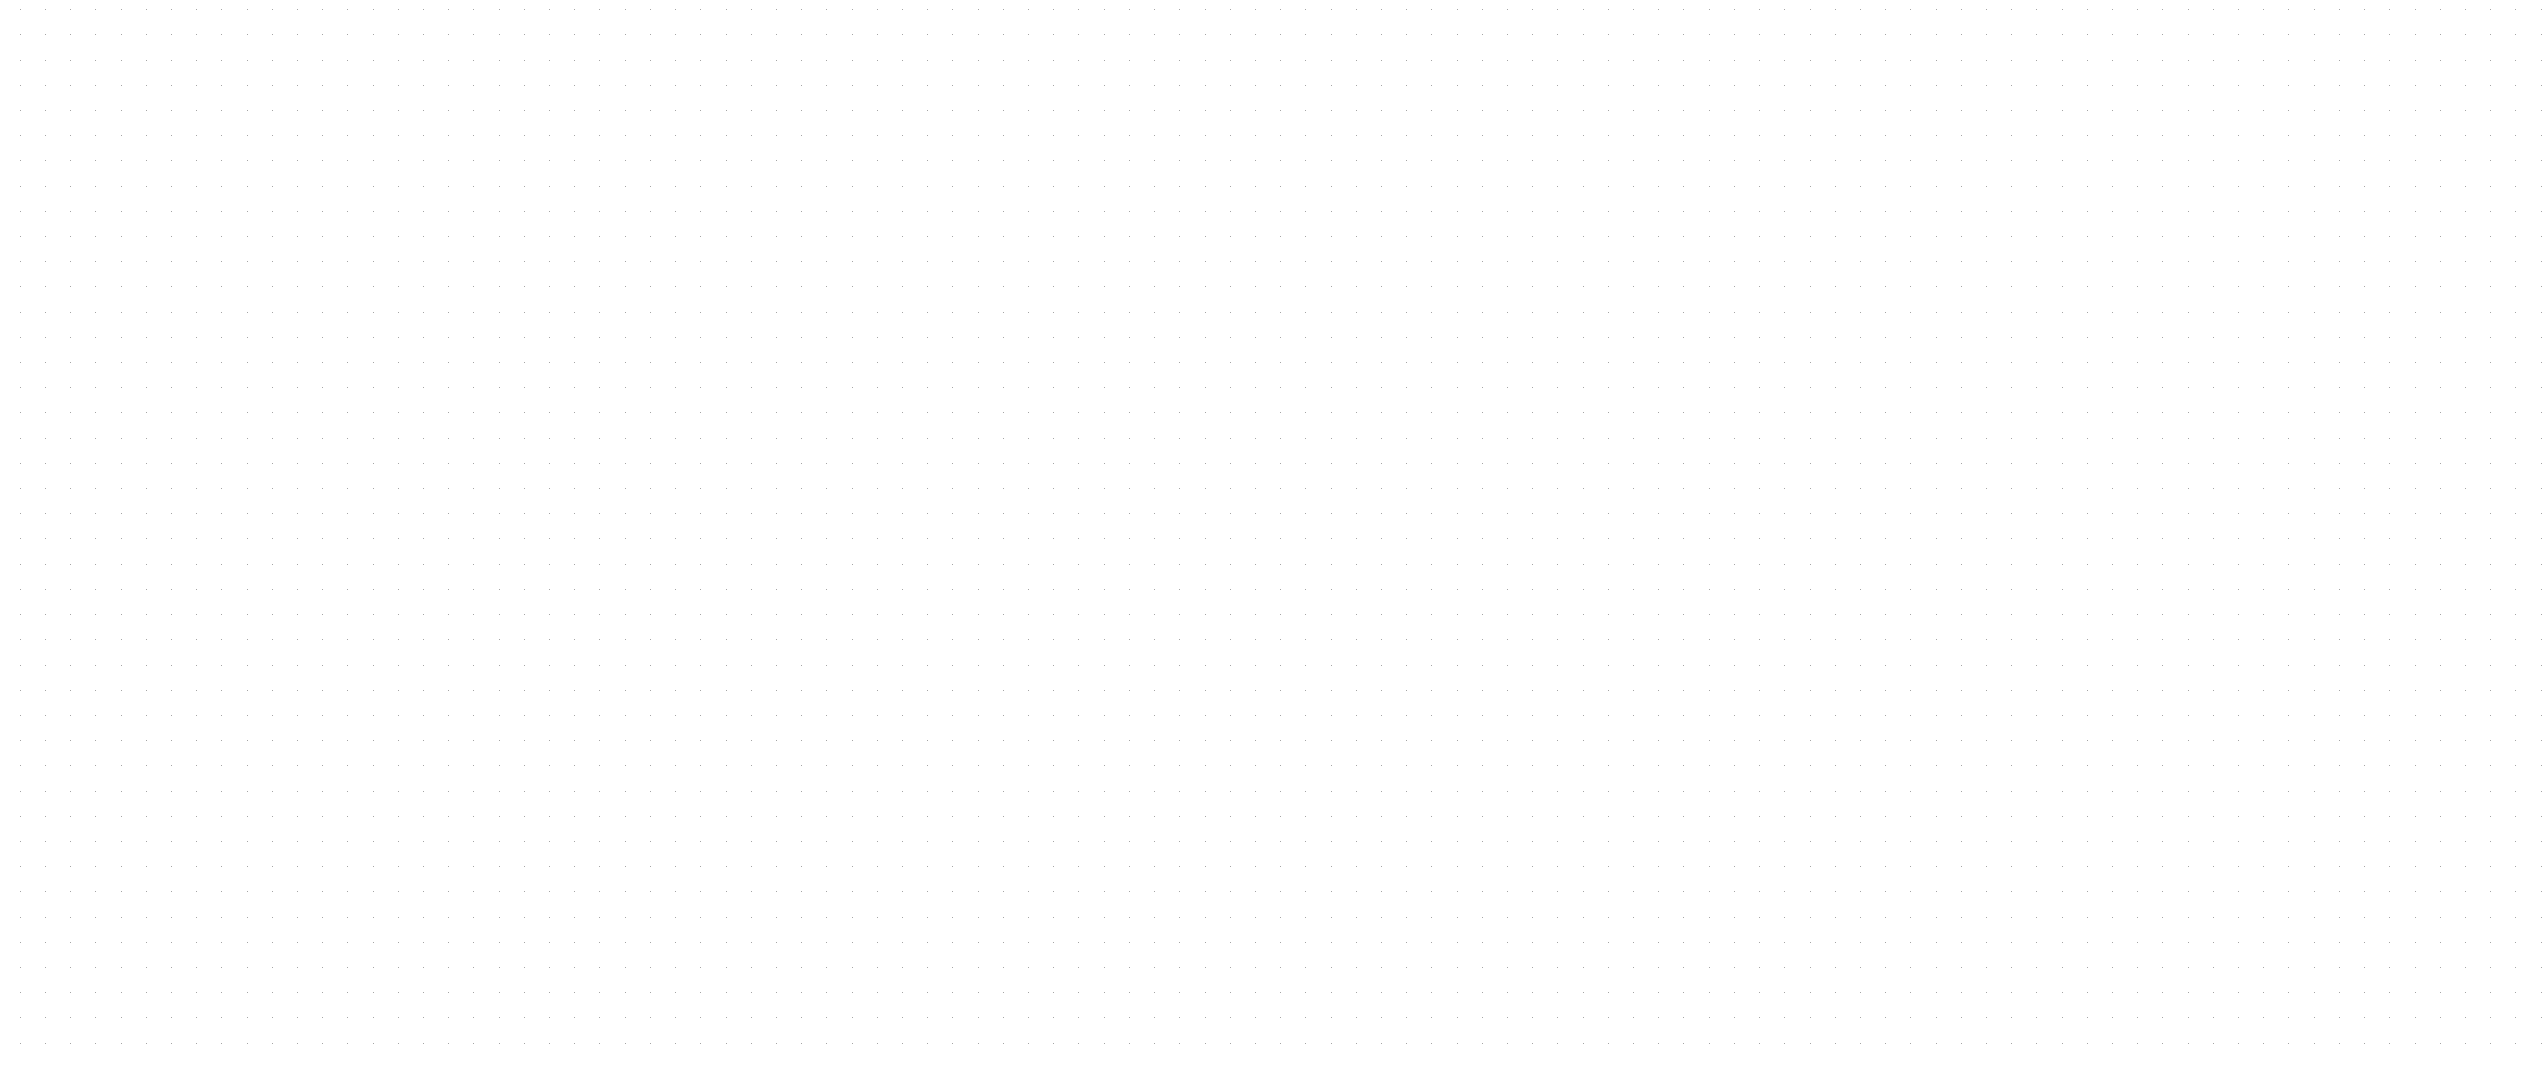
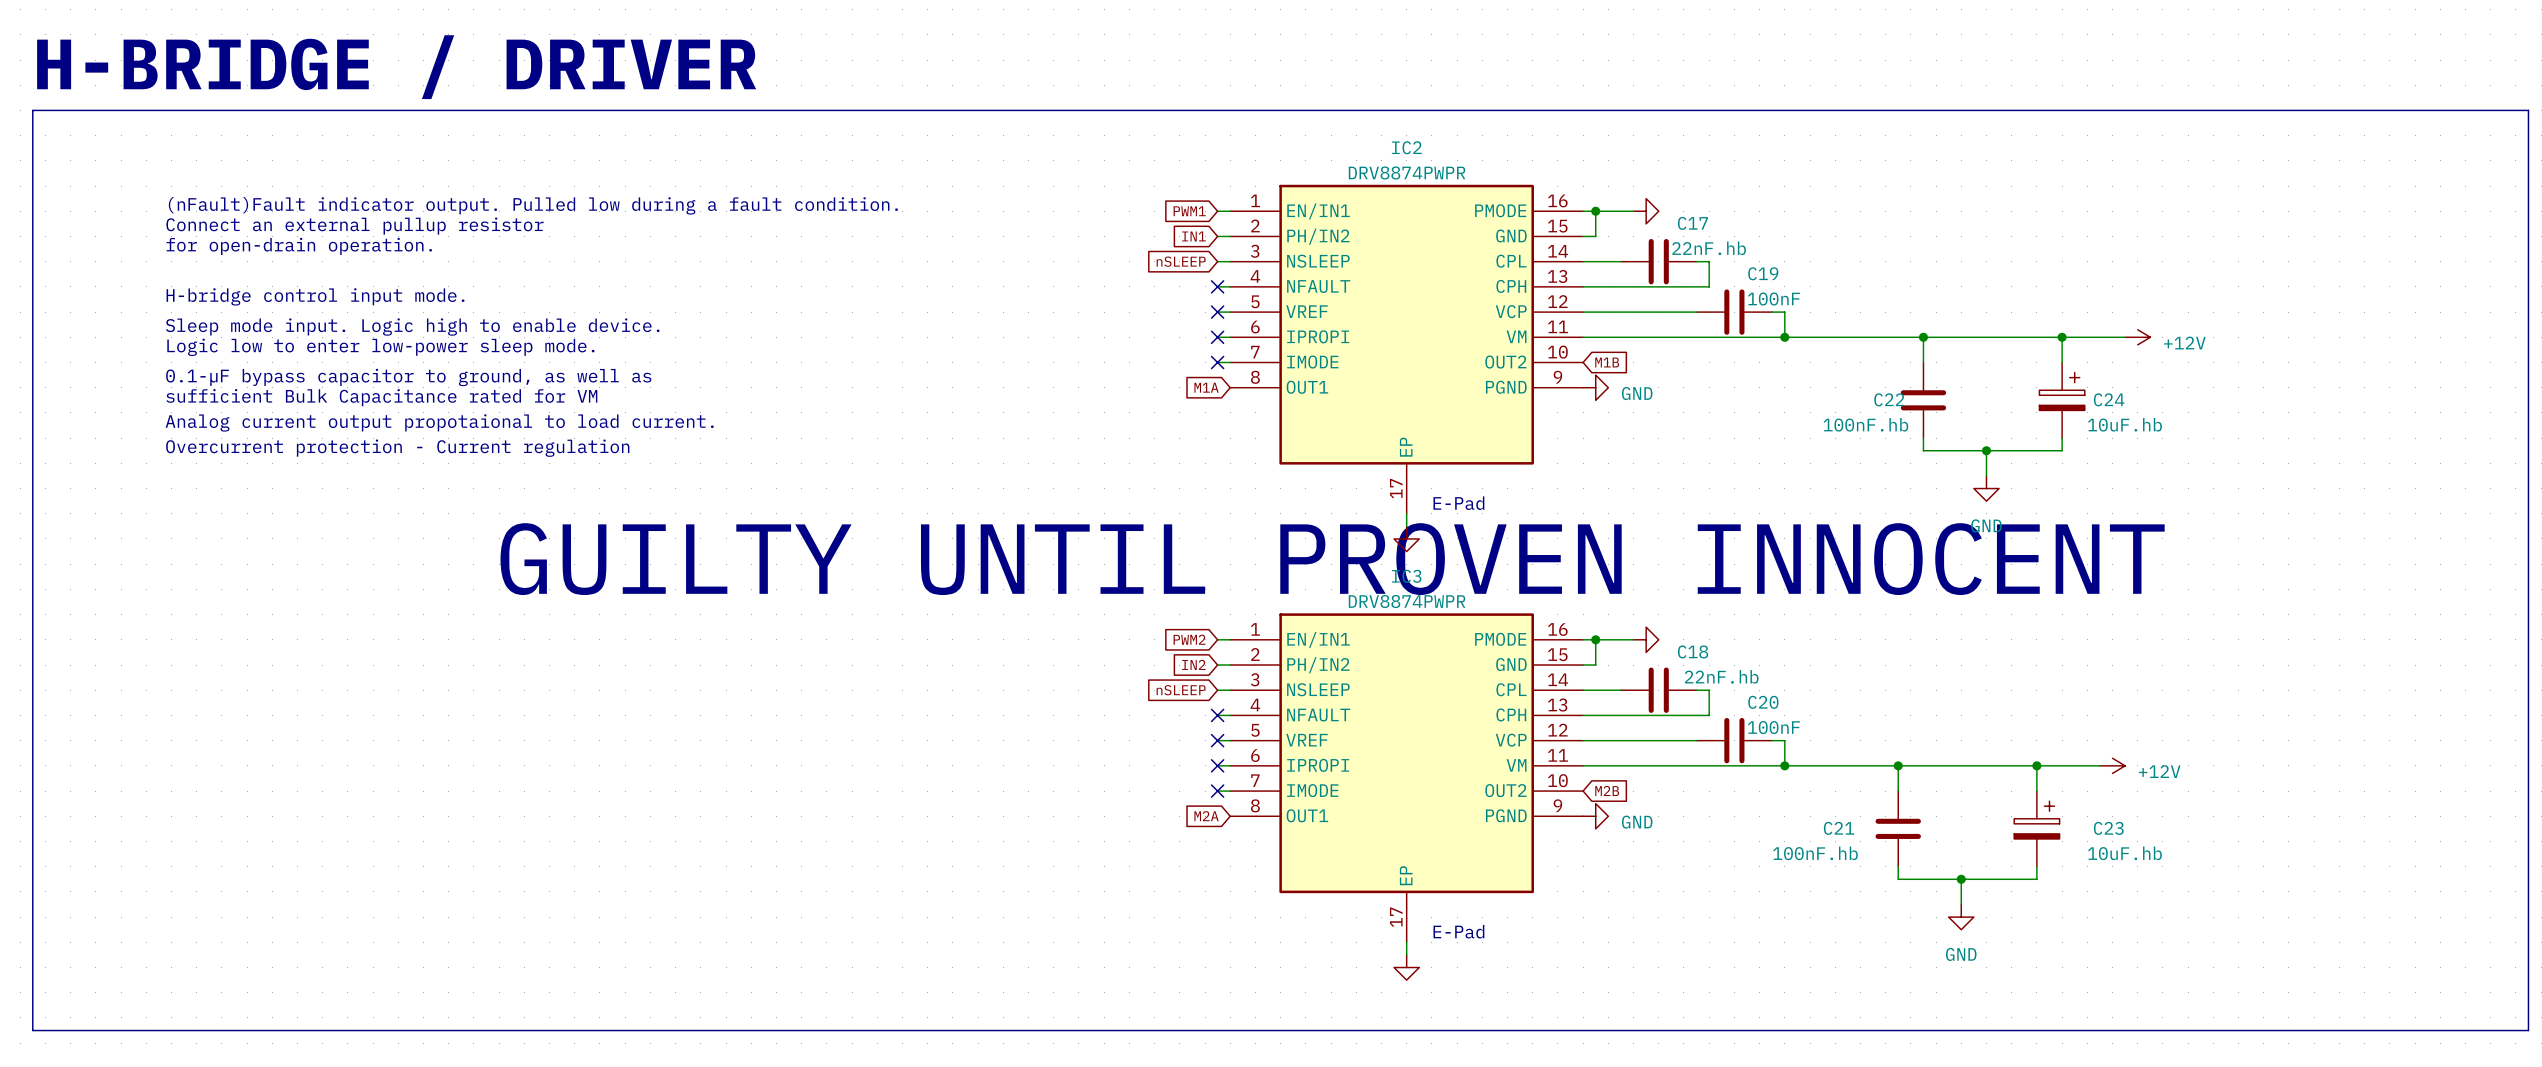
text: none -> H-BRIDGE / DRIVER (396, 67)
line: none -> (32, 110) (32, 1030) (2528, 1030) (2528, 110) (32, 110)
text: none -> (nFault)Fault indicator output. Pulled low during a fault condition. (533, 205)
global label: none -> PWM1 (1189, 211)
wire: none -> (1217, 211) (1230, 211)
wire: none -> (1583, 211) (1633, 211)
wire: none -> (1595, 211) (1595, 236) (1583, 236)
junction: none -> (1595, 211)
power symbol: none -> (1646, 211)
text: none -> Connect an external pullup resistor (355, 226)
global label: none -> IN1 (1193, 236)
wire: none -> (1217, 236) (1230, 236)
text: none -> for open-drain operation. (299, 246)
global label: none -> nSLEEP (1181, 261)
wire: none -> (1217, 261) (1230, 261)
wire: none -> (1583, 261) (1620, 261)
C17: none -> 22nF.hb (1658, 261)
wire: none -> (1696, 261) (1709, 261) (1709, 286) (1583, 286)
wire: none -> (1217, 286) (1230, 286)
no-connect mark: none -> (1217, 286)
text: none -> H-bridge control input mode. (315, 296)
wire: none -> (1217, 312) (1230, 312)
no-connect mark: none -> (1217, 312)
wire: none -> (1583, 312) (1696, 312)
C19: none -> 100nF (1734, 312)
wire: none -> (1772, 312) (1784, 312) (1784, 337)
text: none -> Sleep mode input. Logic high to enable device. (412, 327)
wire: none -> (1217, 337) (1230, 337)
no-connect mark: none -> (1217, 337)
wire: none -> (1583, 337) (2125, 337)
junction: none -> (1784, 337)
wire: none -> (1923, 337) (1923, 362)
junction: none -> (1923, 337)
wire: none -> (2062, 337) (2062, 362)
junction: none -> (2062, 337)
power symbol: none -> +12V (2137, 337)
text: none -> Logic low to enter low-power sleep mode. (380, 347)
IC2: none -> DRV8874PWPR (1406, 349)
wire: none -> (1217, 362) (1230, 362)
no-connect mark: none -> (1217, 362)
global label: none -> M1B (1607, 362)
text: none -> 0.1-µF bypass capacitor to ground, as well as (408, 377)
global label: none -> M1A (1206, 387)
power symbol: none -> GND (1595, 387)
text: none -> sufficient Bulk Capacitance rated for VM (381, 397)
C22: none -> 100nF.hb (1923, 400)
C24: none -> 10uF.hb (2062, 400)
text: none -> Analog current output propotaional to load current. (439, 422)
wire: none -> (1923, 438) (1923, 450) (2062, 450) (2062, 438)
text: none -> Overcurrent protection - Current regulation (397, 448)
wire: none -> (1986, 450) (1986, 475)
junction: none -> (1986, 450)
power symbol: none -> GND (1986, 488)
text: none -> E-Pad (1458, 503)
wire: none -> (1406, 513) (1406, 526)
power symbol: none -> (1406, 538)
text: none -> GUILTY UNTIL PROVEN INNOCENT (1332, 559)
global label: none -> PWM2 (1189, 639)
wire: none -> (1217, 639) (1230, 639)
wire: none -> (1583, 639) (1633, 639)
wire: none -> (1595, 639) (1595, 665) (1583, 665)
junction: none -> (1595, 639)
power symbol: none -> (1646, 639)
global label: none -> IN2 (1193, 664)
wire: none -> (1217, 665) (1230, 665)
global label: none -> nSLEEP (1181, 690)
wire: none -> (1217, 690) (1230, 690)
wire: none -> (1583, 690) (1620, 690)
C18: none -> 22nF.hb (1658, 690)
wire: none -> (1696, 690) (1709, 690) (1709, 715) (1583, 715)
wire: none -> (1217, 715) (1230, 715)
no-connect mark: none -> (1217, 715)
wire: none -> (1217, 740) (1230, 740)
no-connect mark: none -> (1217, 740)
wire: none -> (1583, 740) (1696, 740)
C20: none -> 100nF (1734, 740)
wire: none -> (1772, 740) (1784, 740) (1784, 765)
wire: none -> (1217, 765) (1230, 765)
no-connect mark: none -> (1217, 765)
wire: none -> (1583, 765) (2099, 765)
junction: none -> (1784, 765)
wire: none -> (1898, 765) (1898, 791)
junction: none -> (1898, 765)
wire: none -> (2036, 765) (2036, 791)
junction: none -> (2036, 765)
power symbol: none -> +12V (2112, 765)
IC3: none -> DRV8874PWPR (1406, 777)
global label: none -> M2B (1607, 790)
wire: none -> (1217, 791) (1230, 791)
no-connect mark: none -> (1217, 791)
global label: none -> M2A (1206, 816)
power symbol: none -> GND (1595, 816)
C21: none -> 100nF.hb (1898, 828)
C23: none -> 10uF.hb (2036, 828)
wire: none -> (1898, 866) (1898, 879) (2036, 879) (2036, 866)
wire: none -> (1961, 879) (1961, 904)
junction: none -> (1961, 879)
power symbol: none -> GND (1961, 917)
text: none -> E-Pad (1458, 931)
wire: none -> (1406, 942) (1406, 954)
power symbol: none -> (1406, 967)

